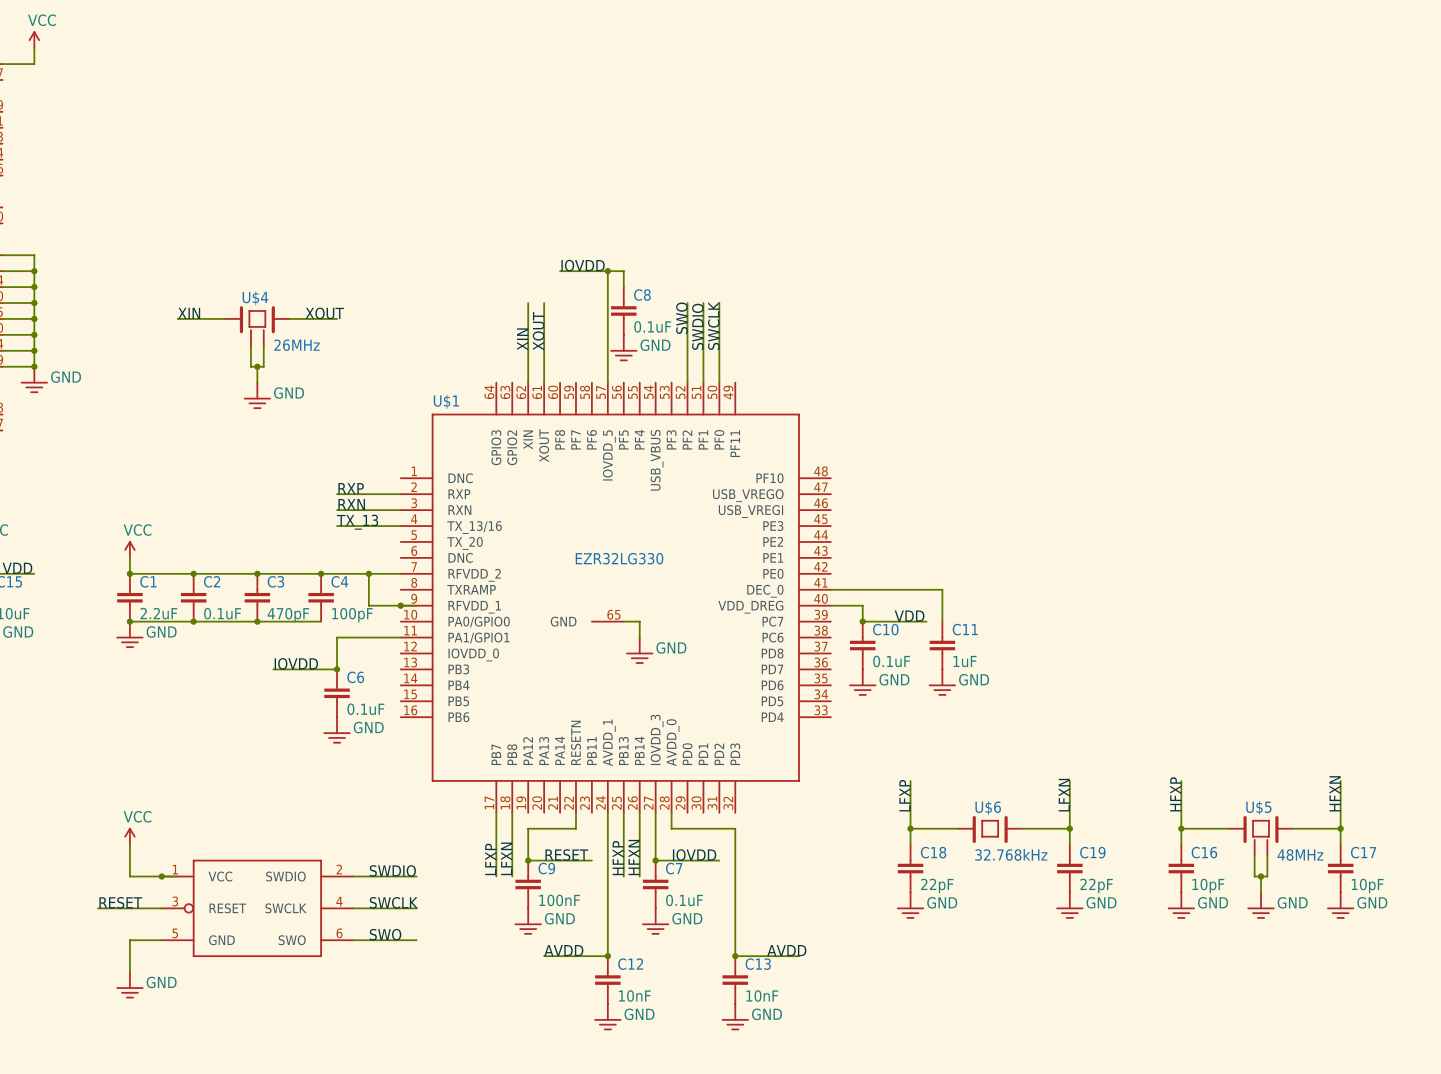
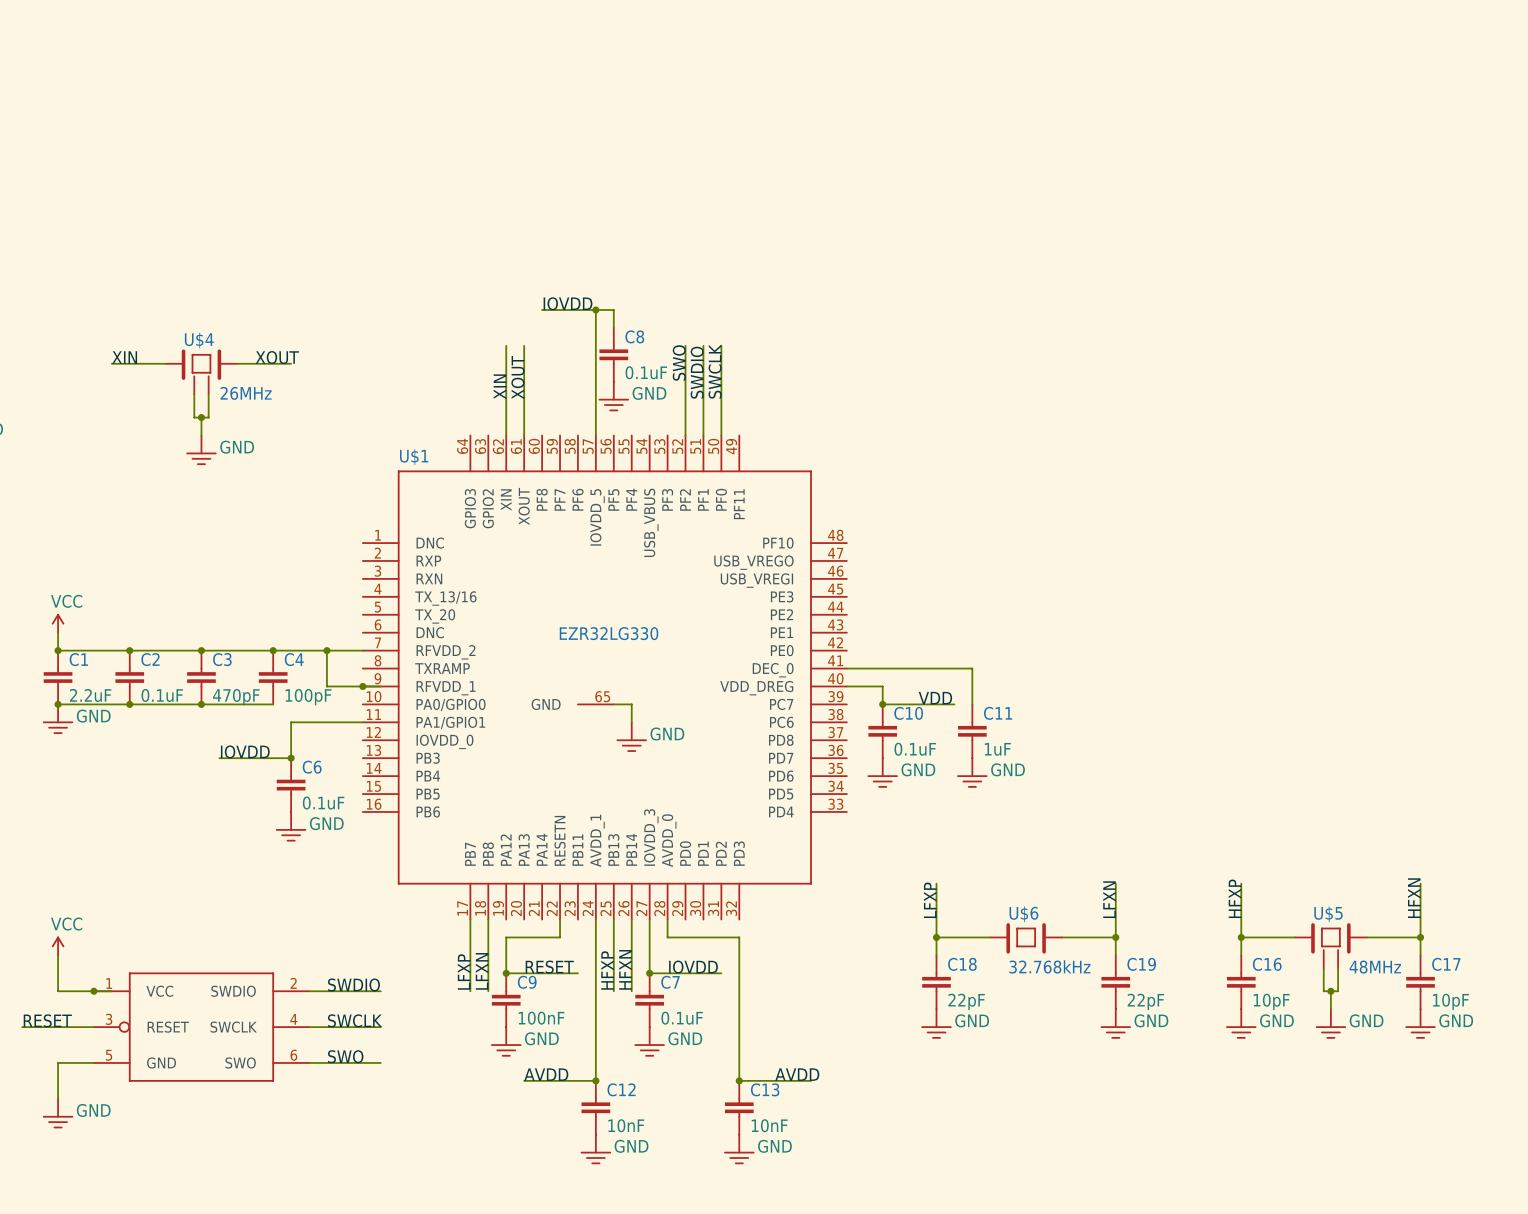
label: RXP (351, 488) -> none
wire: (337, 494) (400, 494) -> none
label: RXN (351, 504) -> none
wire: (337, 510) (400, 510) -> none
label: TX_13 (357, 522) -> none
wire: (337, 526) (400, 526) -> none

